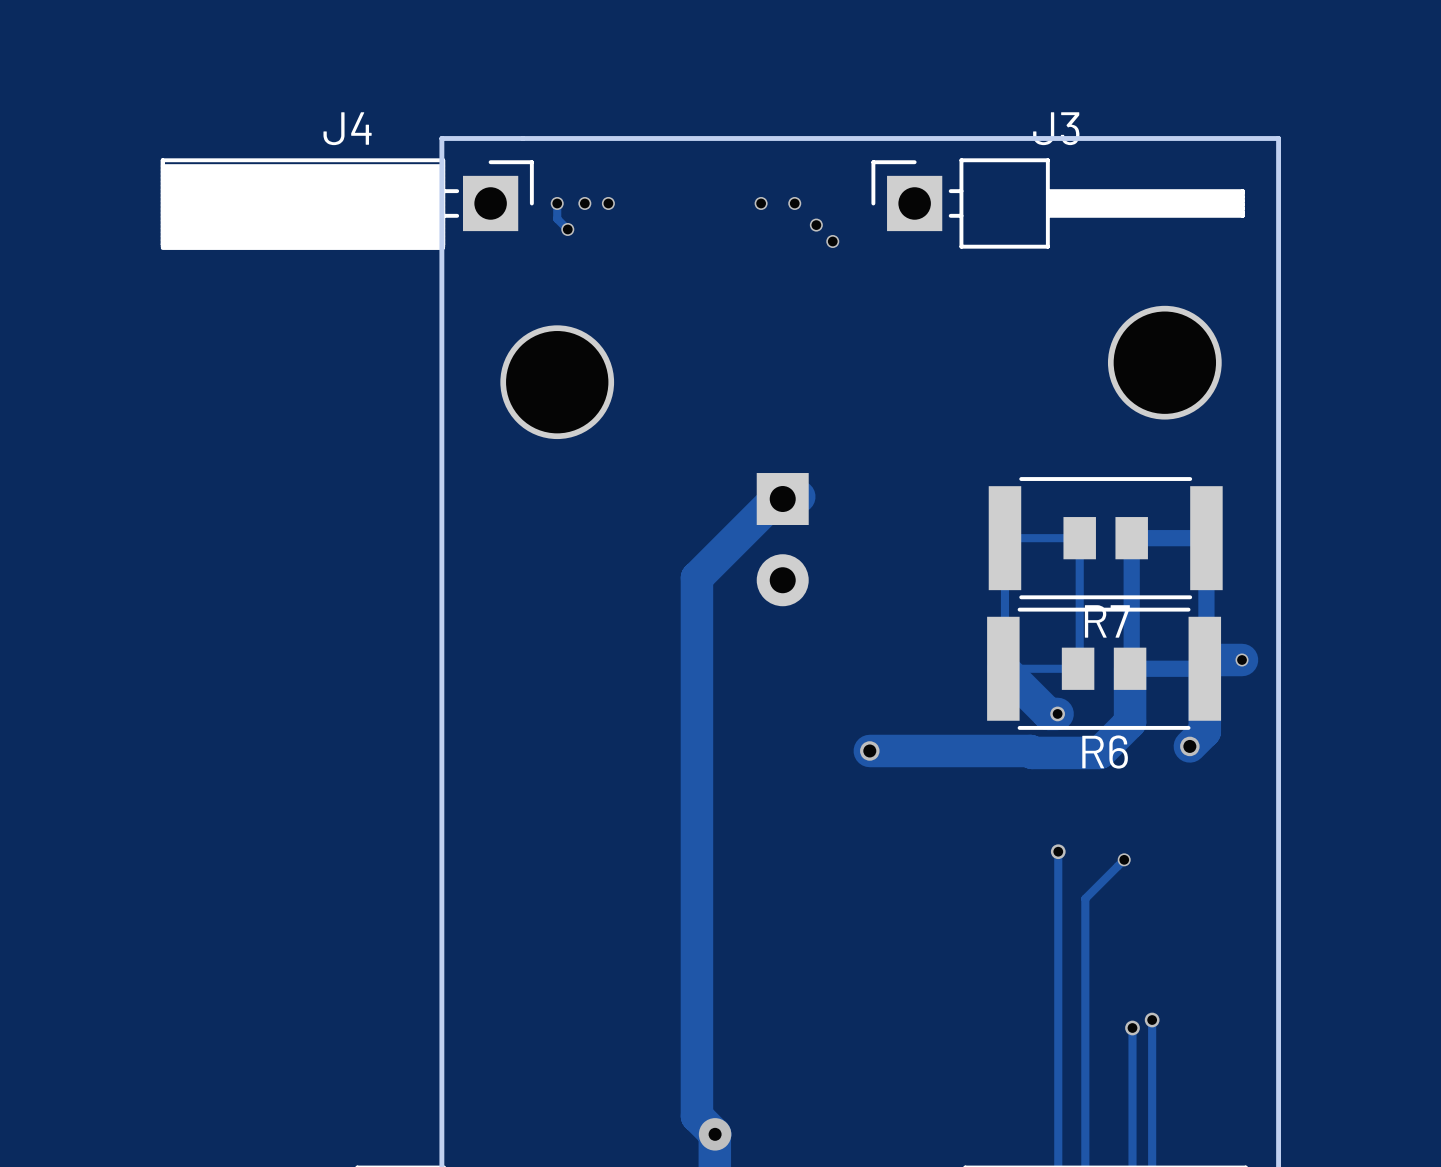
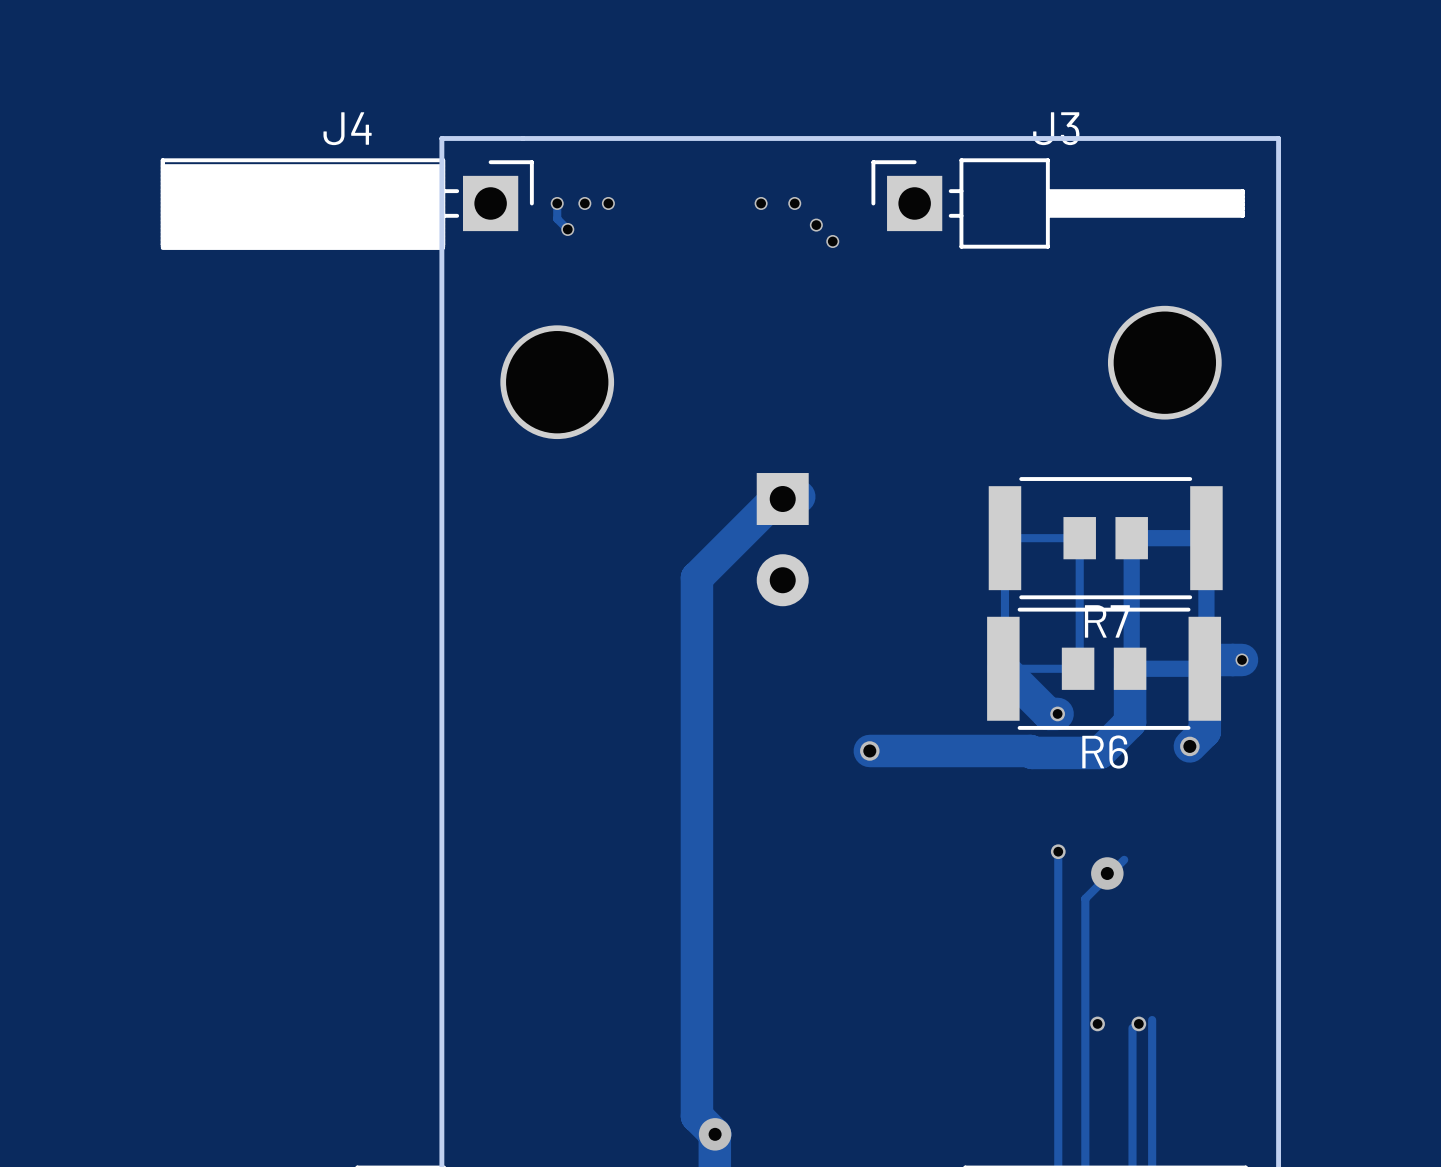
via size: [1117, 853, 1131, 867] -> [1091, 857, 1124, 890]
via: (1152, 1020) -> none
via: none -> (1097, 1023)
via: none -> (1138, 1023)
via: (1132, 1028) -> none

